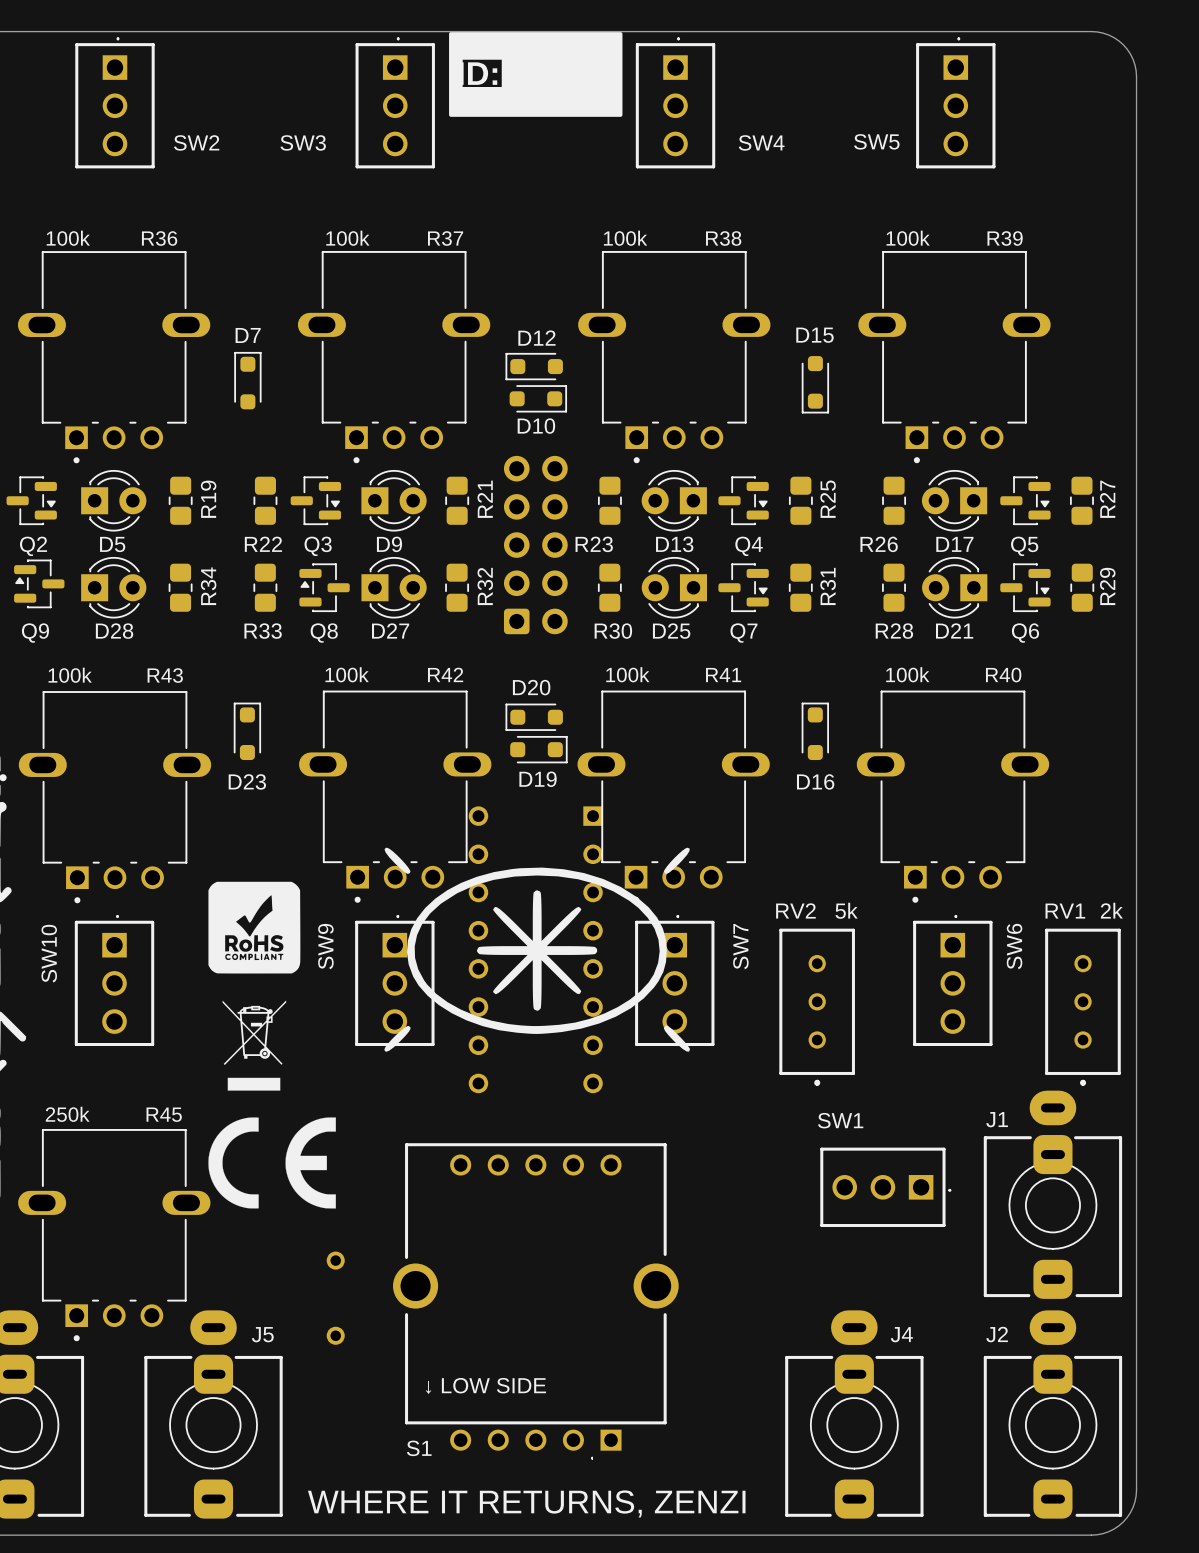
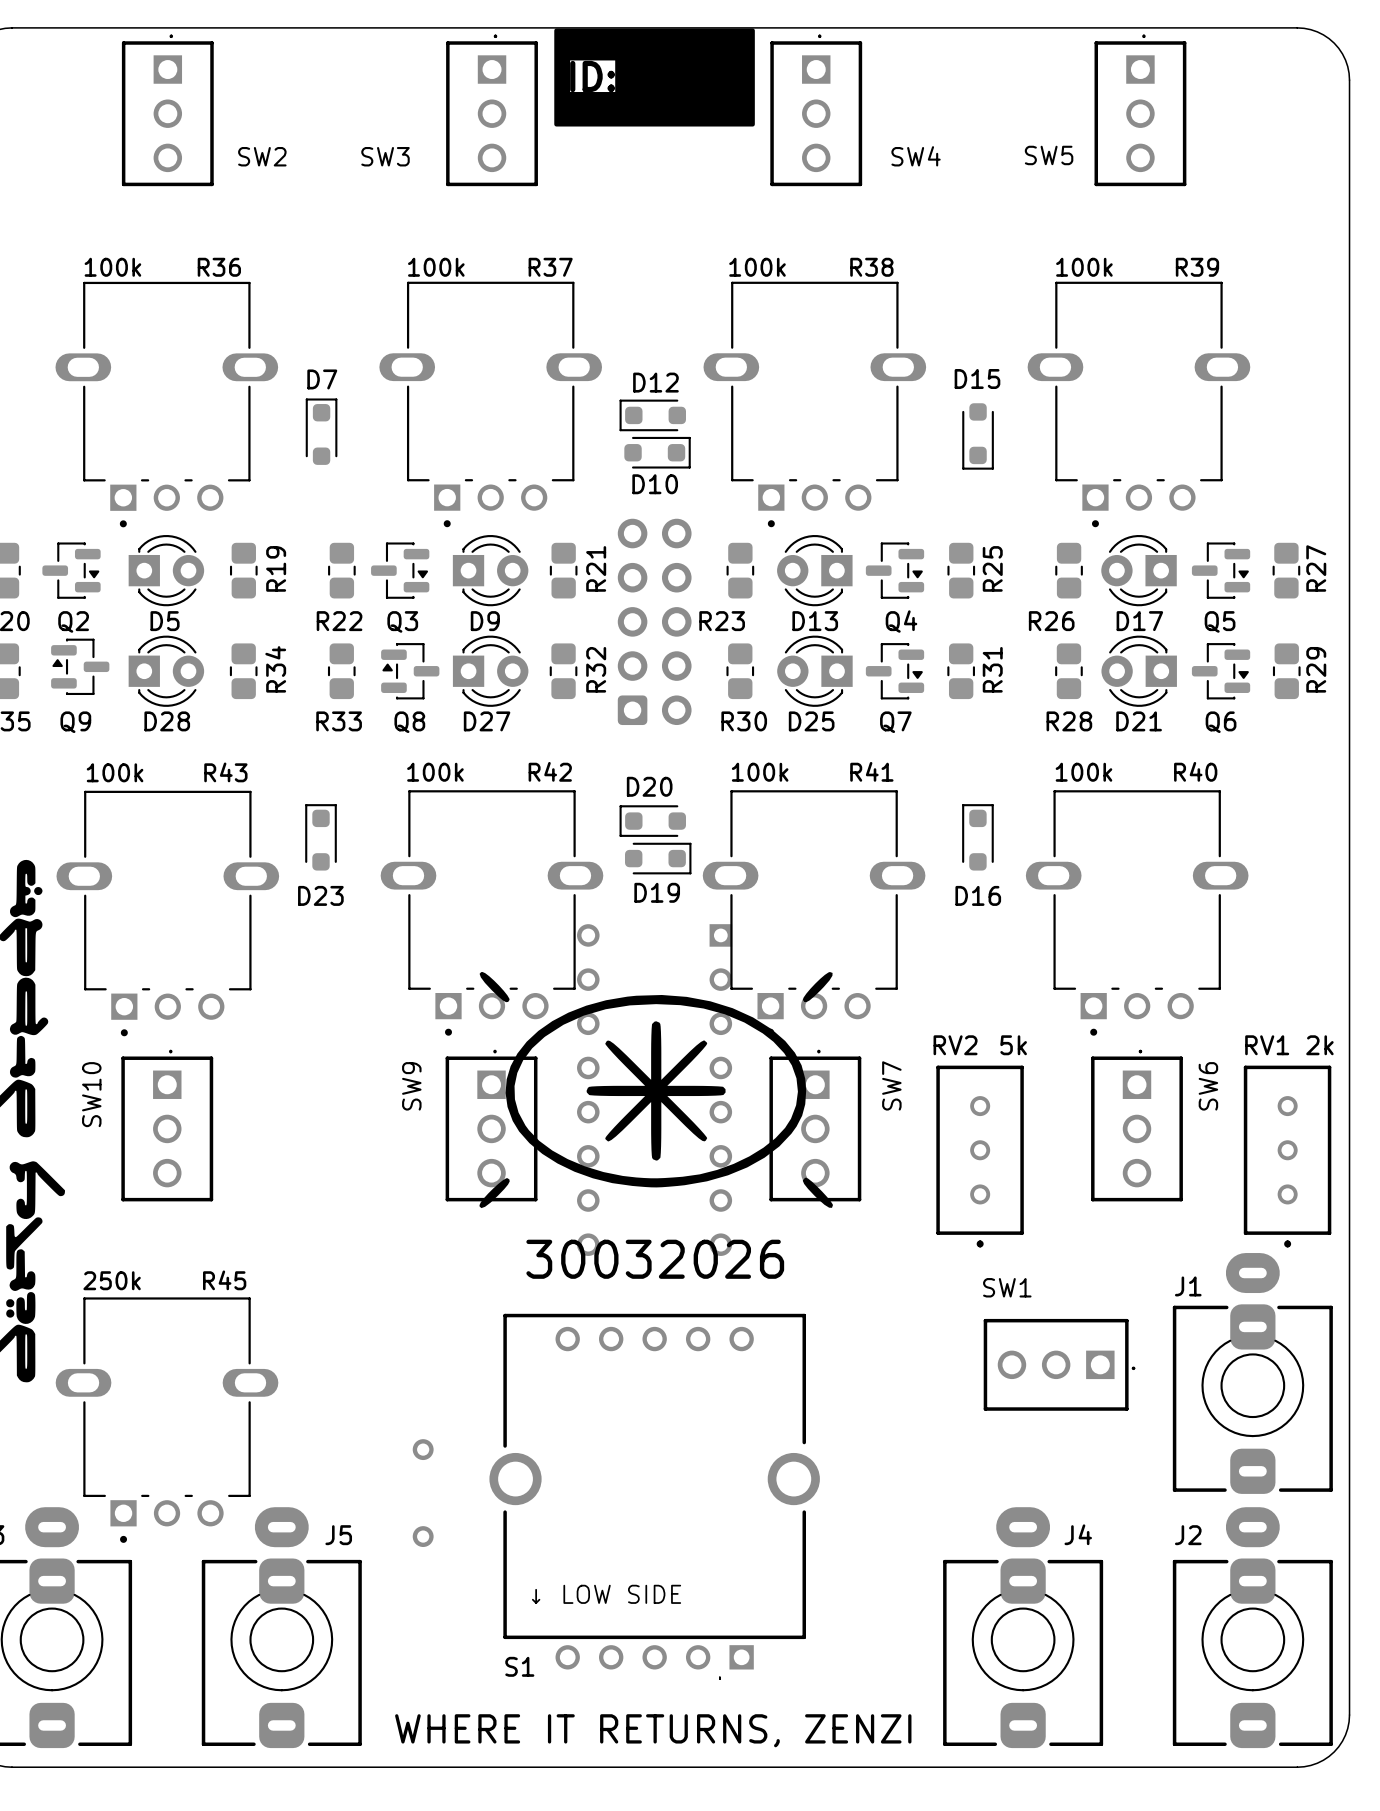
drawing: [208, 881, 301, 974] -> none
drawing: [222, 1000, 287, 1091] -> none
text: none -> 30032026 (655, 1259)
drawing: [208, 1117, 336, 1209] -> none

